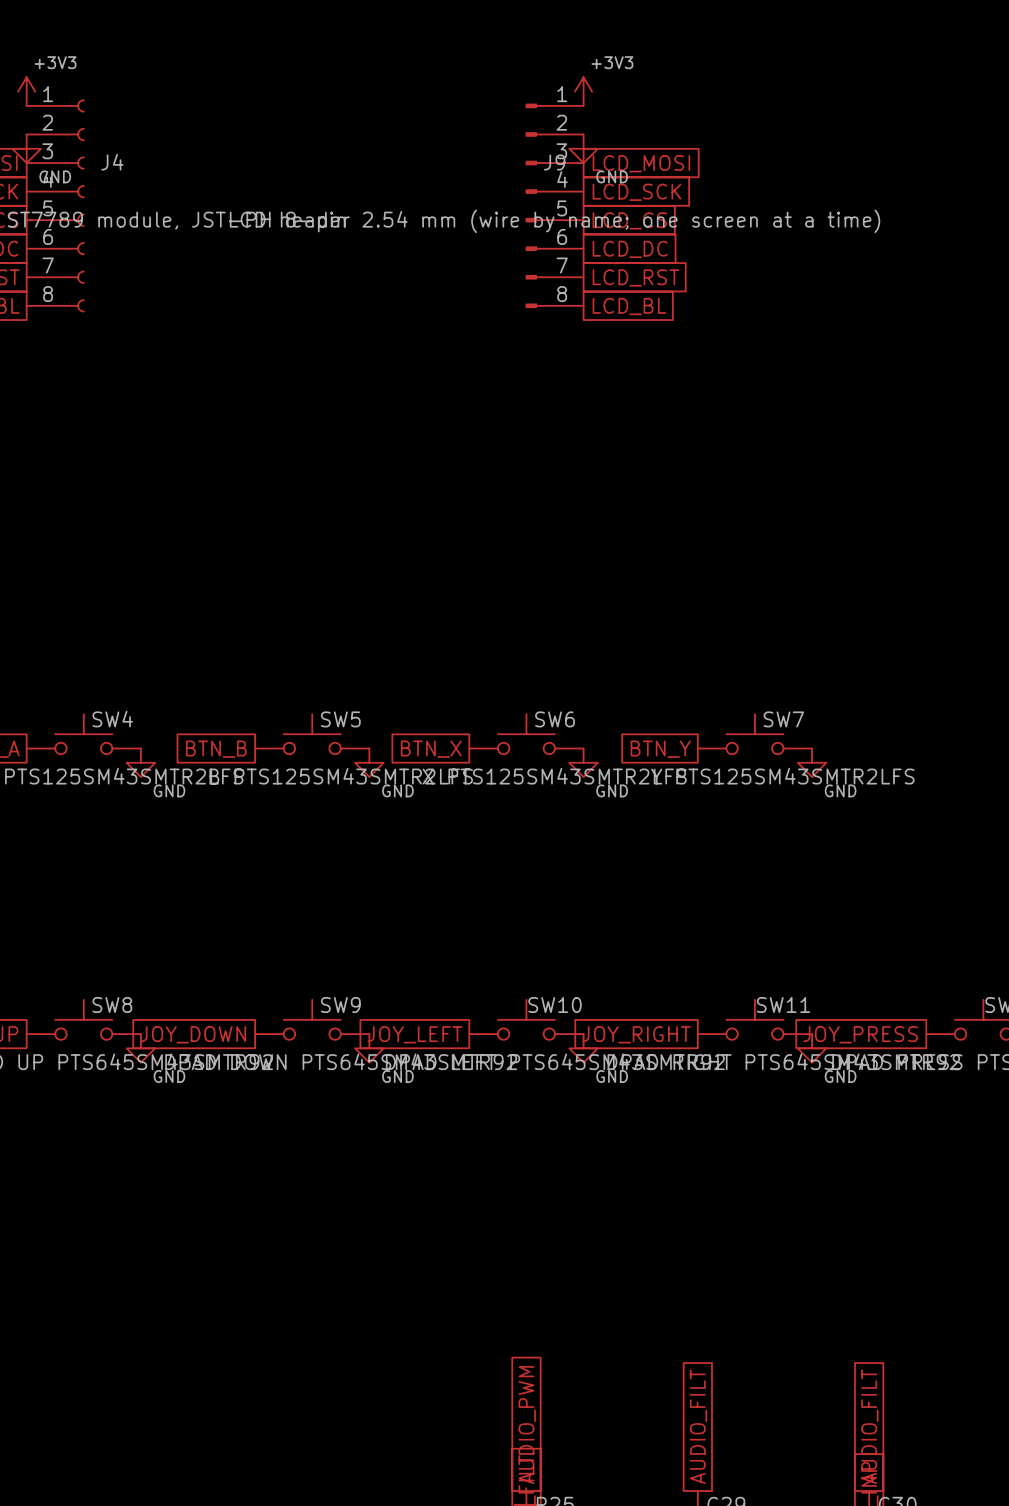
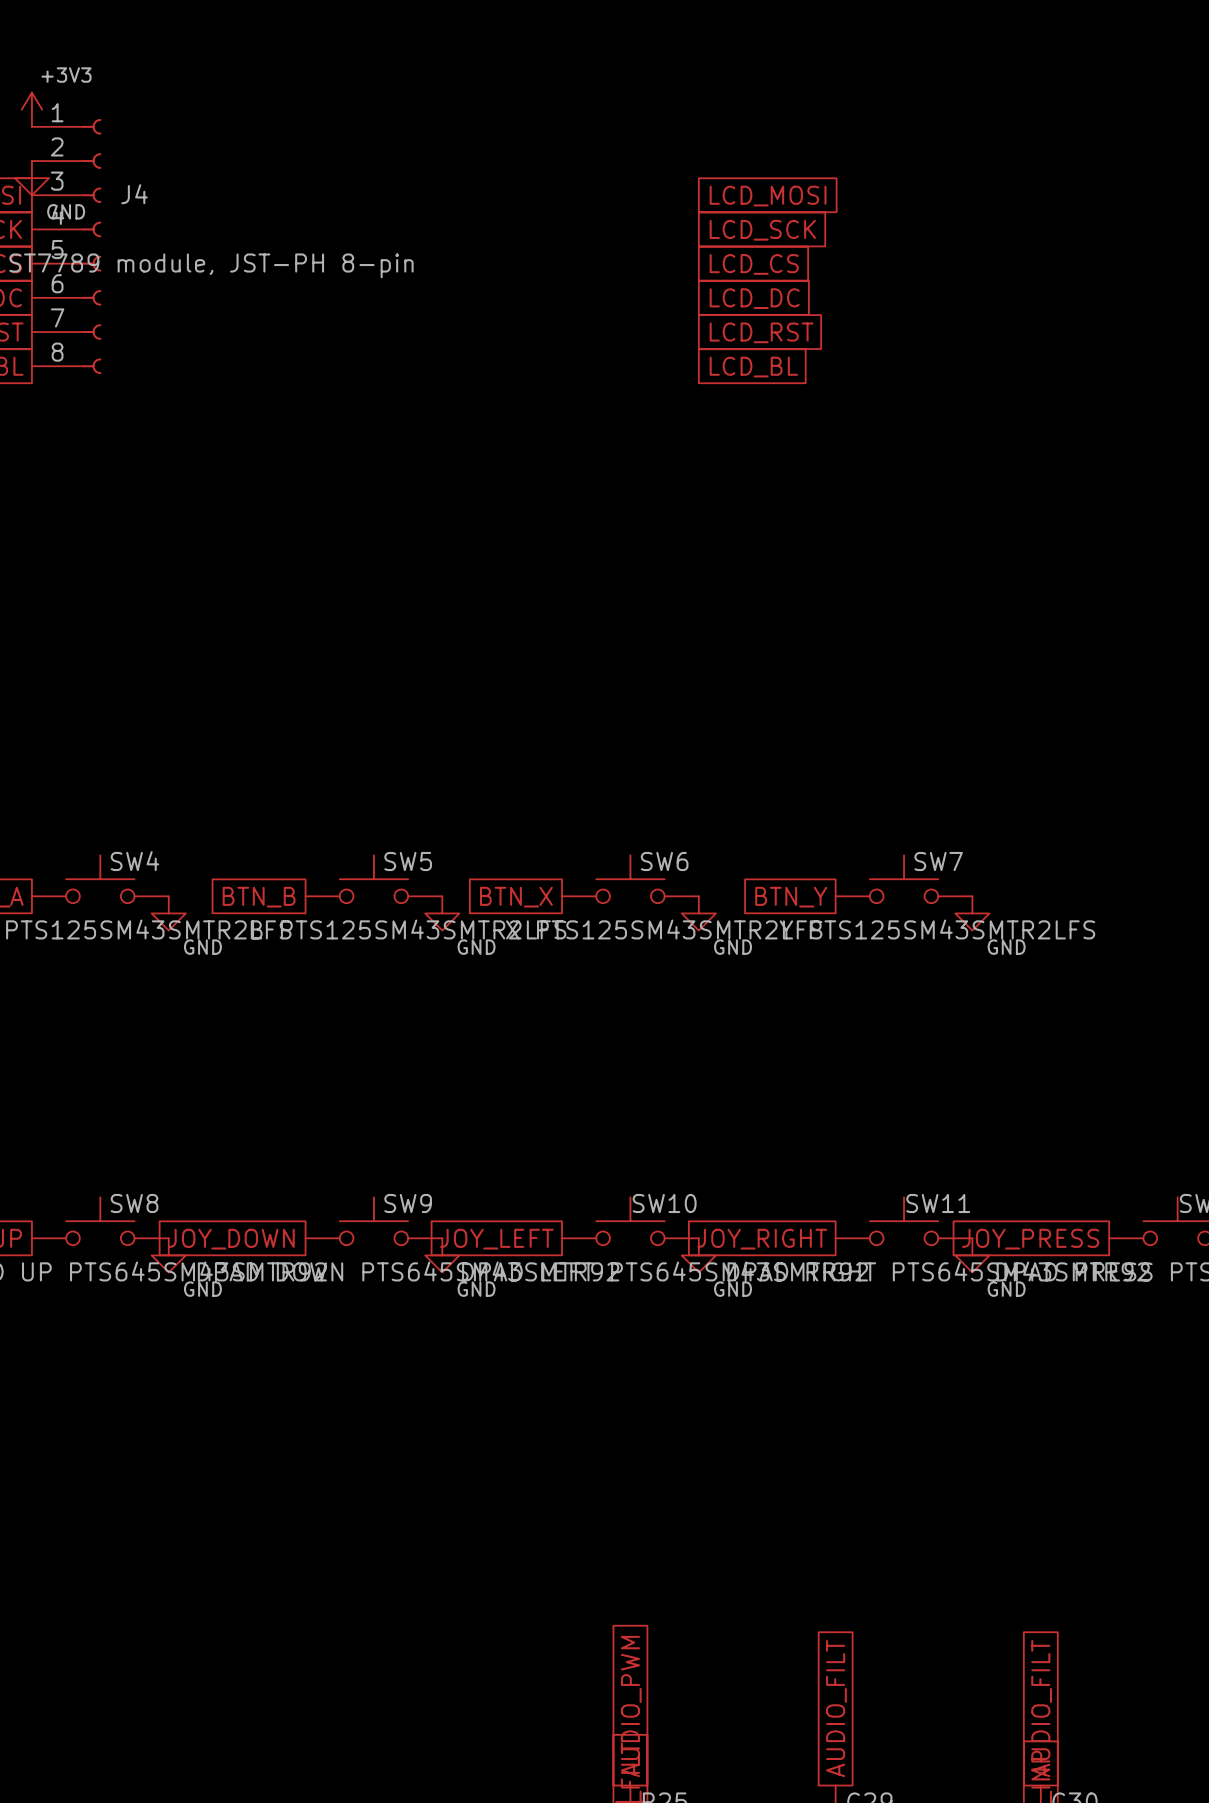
power symbol: +3V3 (583, 91) -> none
power symbol: GND (583, 148) -> none
J9: LCD header 2.54 mm (wire by name; one screen at a time) (554, 205) -> none

